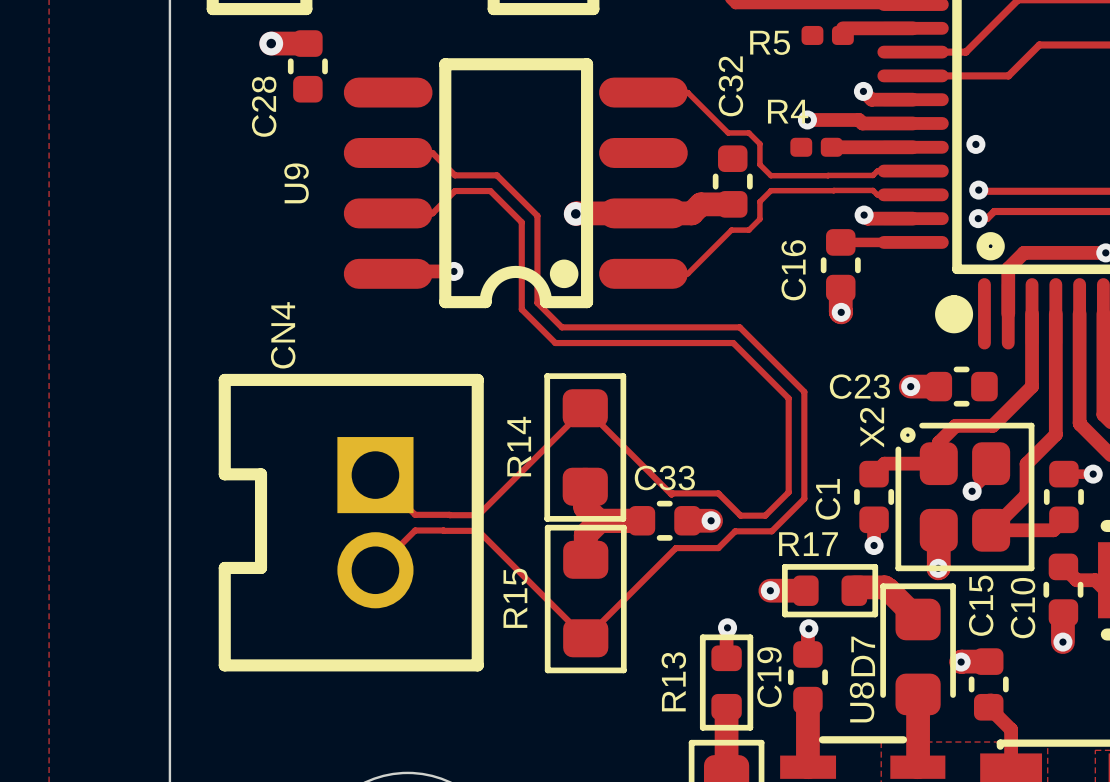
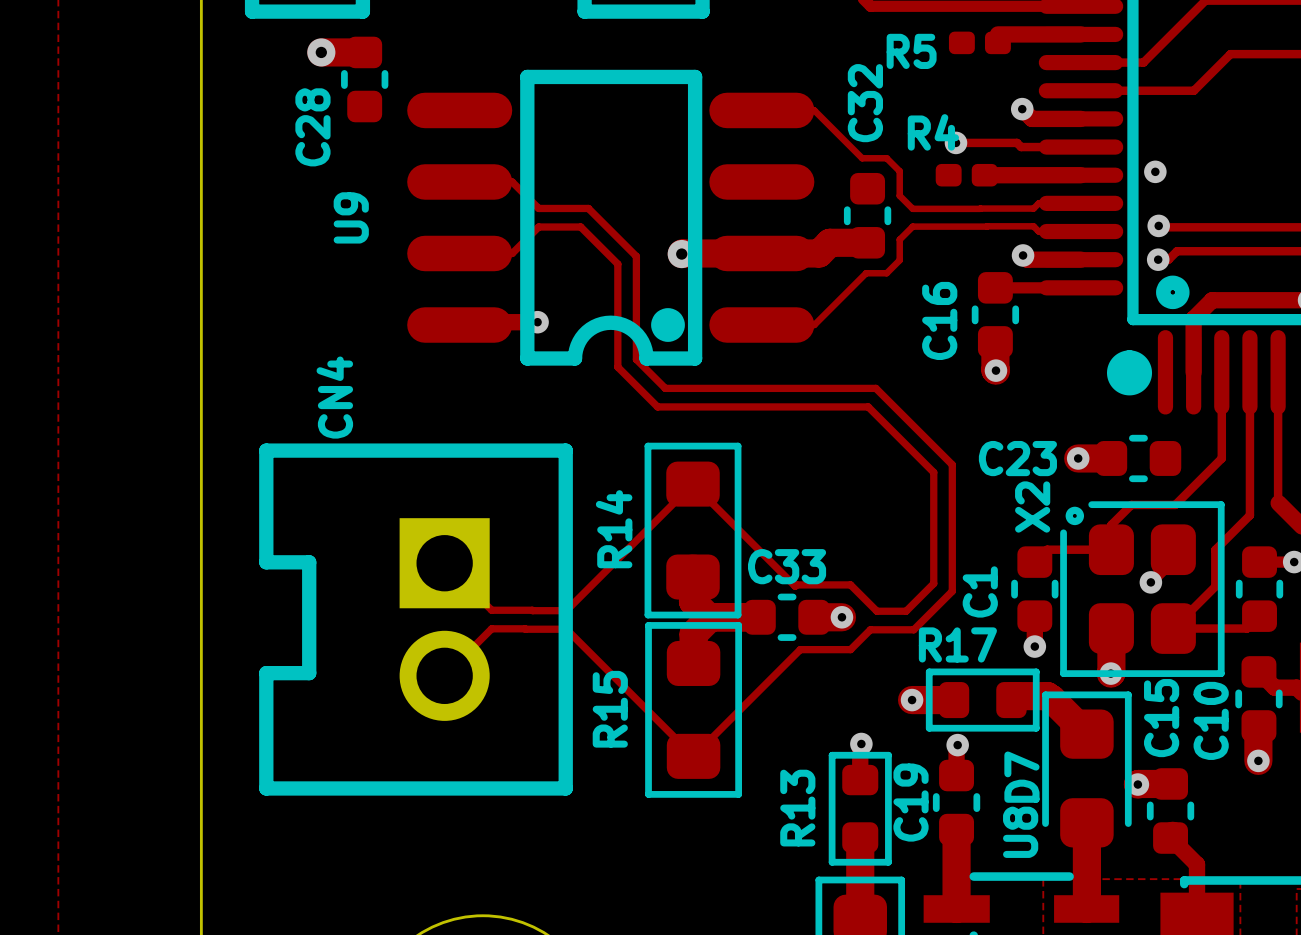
track width: thick (807, 119) (859, 119) (862, 123) (913, 123) -> thin (955, 142) (1017, 142) (1021, 147) (1081, 147)
track width: thick (1032, 313) (1032, 386) (992, 425) (955, 425) (938, 442) (938, 463) (884, 463) (874, 474) -> thin (1221, 372) (1221, 458) (1175, 504) (1131, 504) (1111, 524) (1111, 549) (1047, 549) (1034, 562)
track width: thick (1055, 313) (1055, 434) (1026, 463) (1026, 494) (991, 530) (1053, 530) (1063, 519) -> thin (1249, 372) (1249, 515) (1215, 550) (1215, 586) (1173, 628) (1247, 628) (1259, 616)
track width: thick (1079, 313) (1079, 422) -> thin (1278, 372) (1278, 501)

